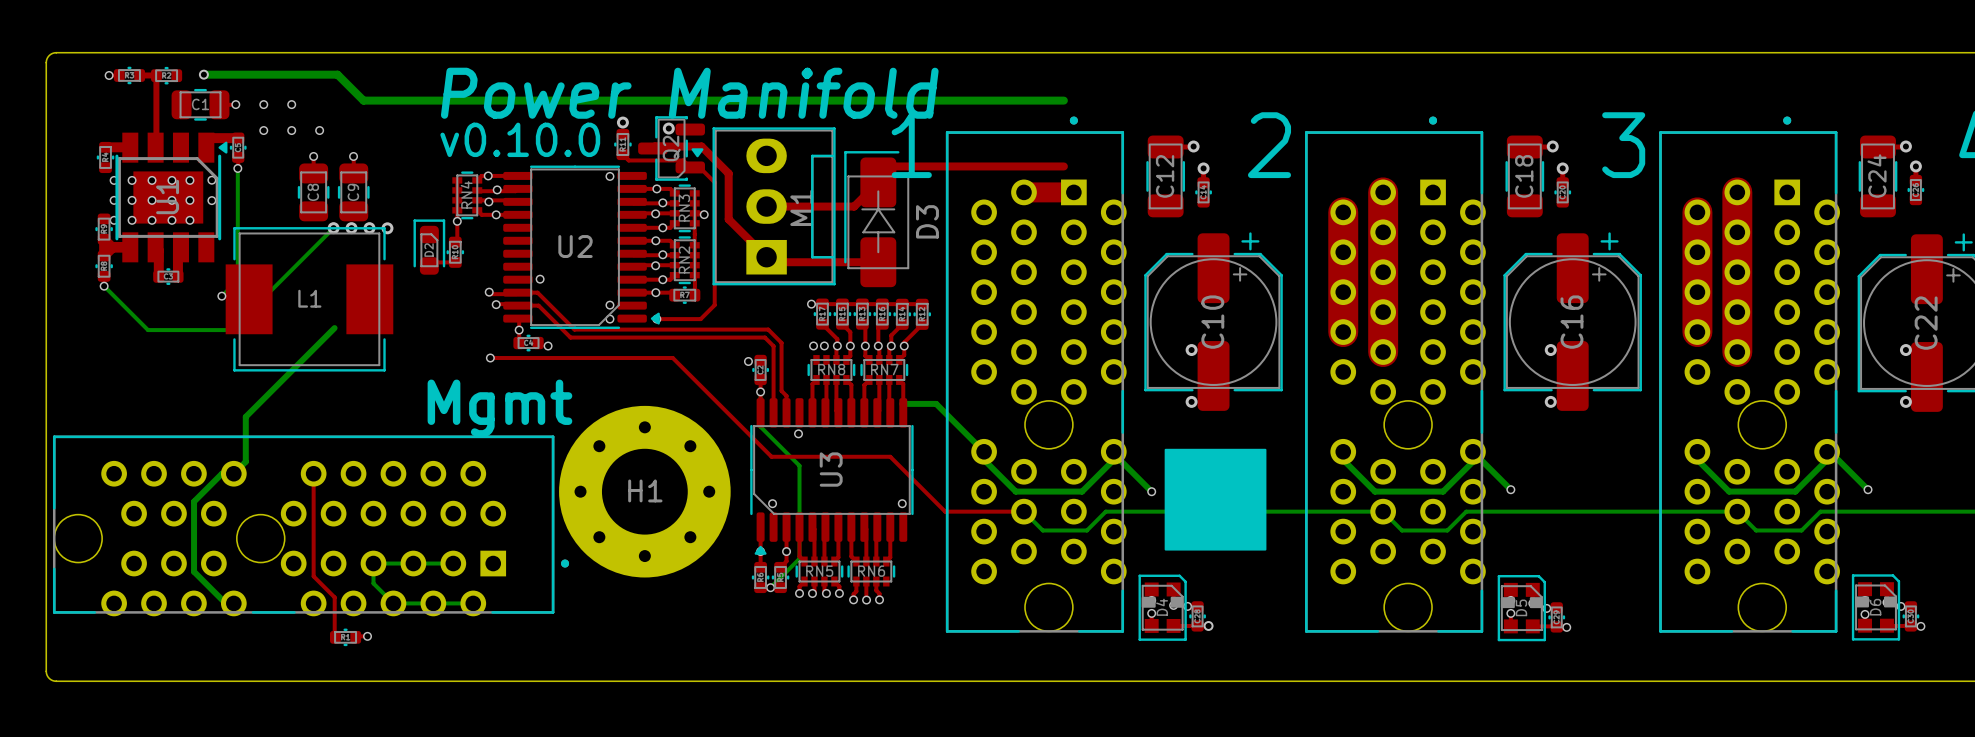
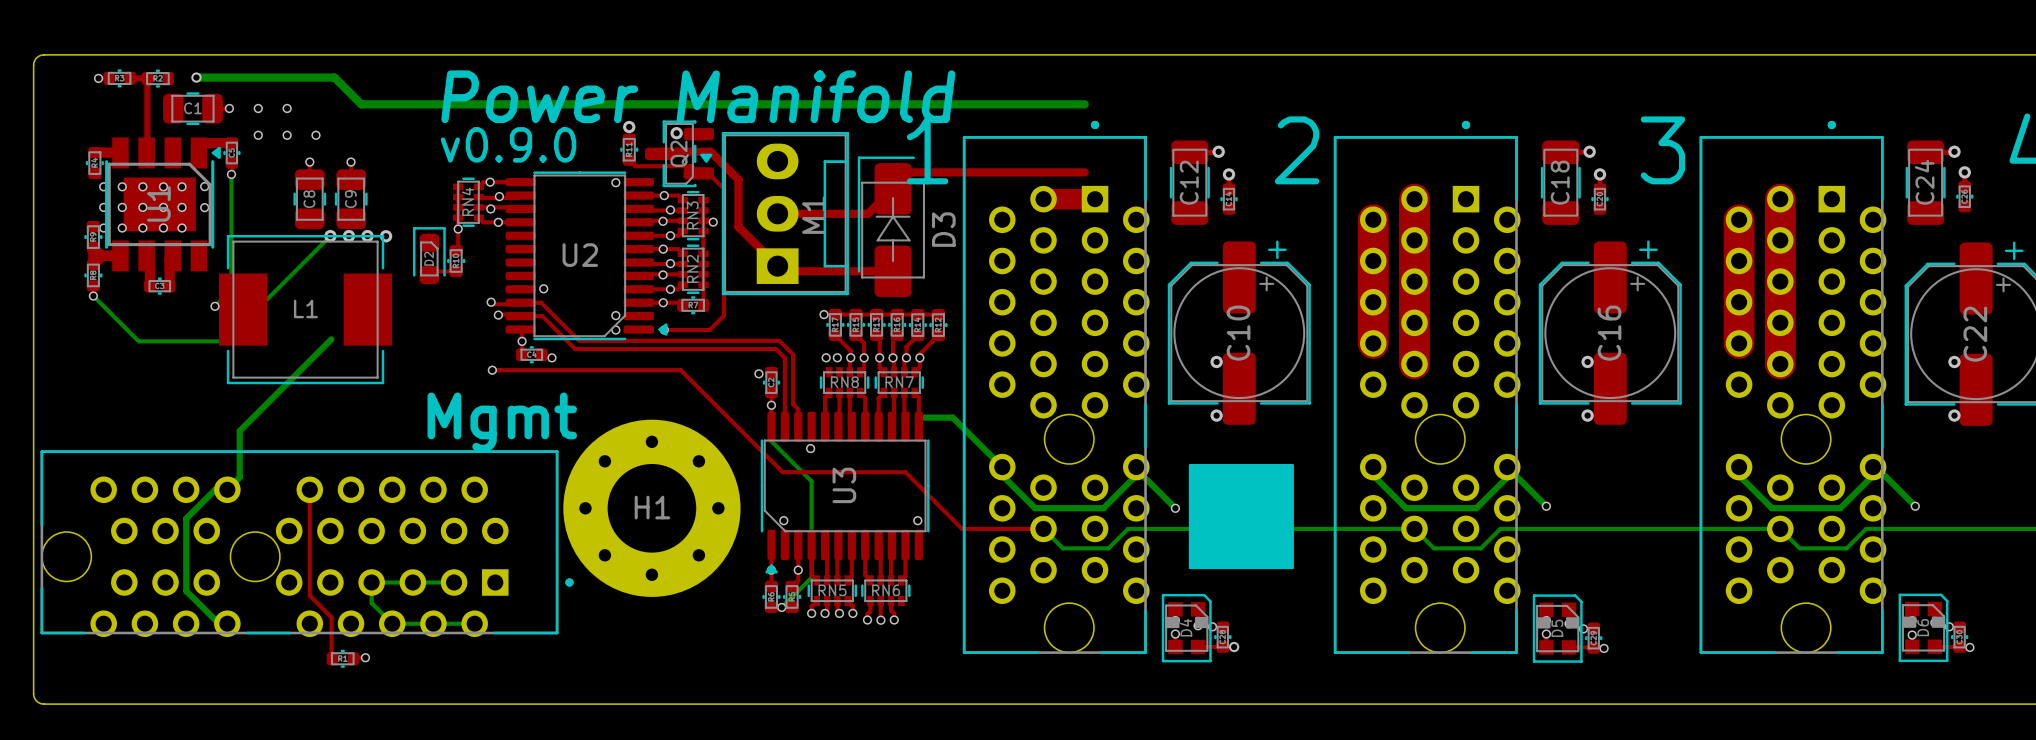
text: v0.10.0 (520, 139) -> v0.9.0 (508, 144)

